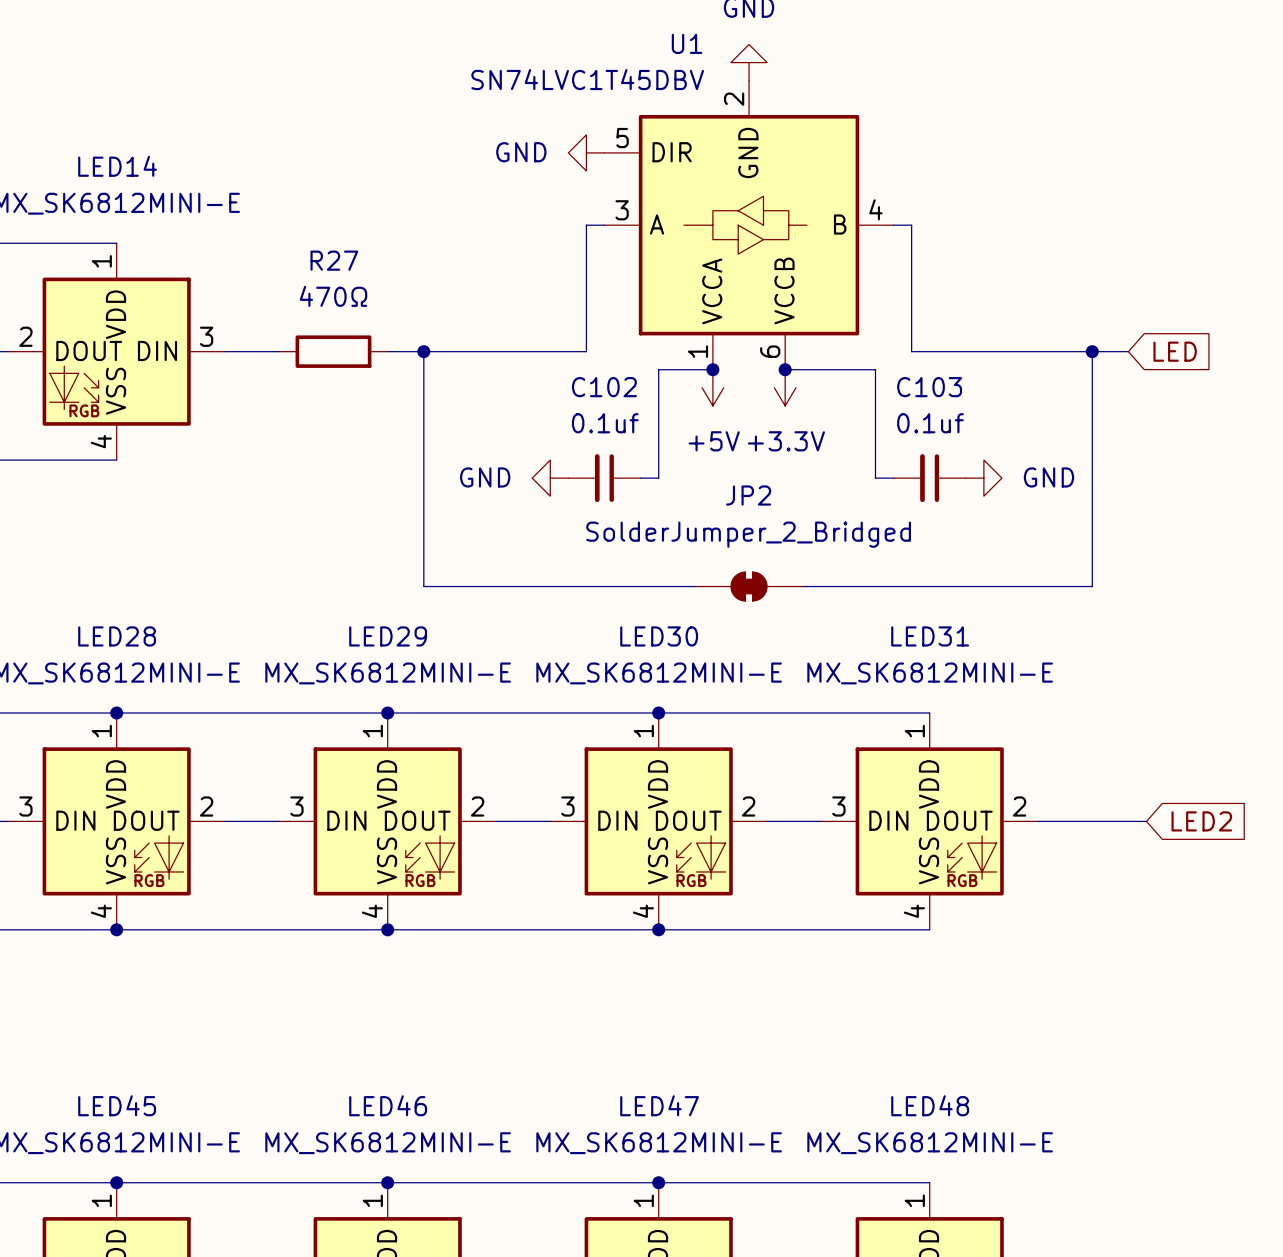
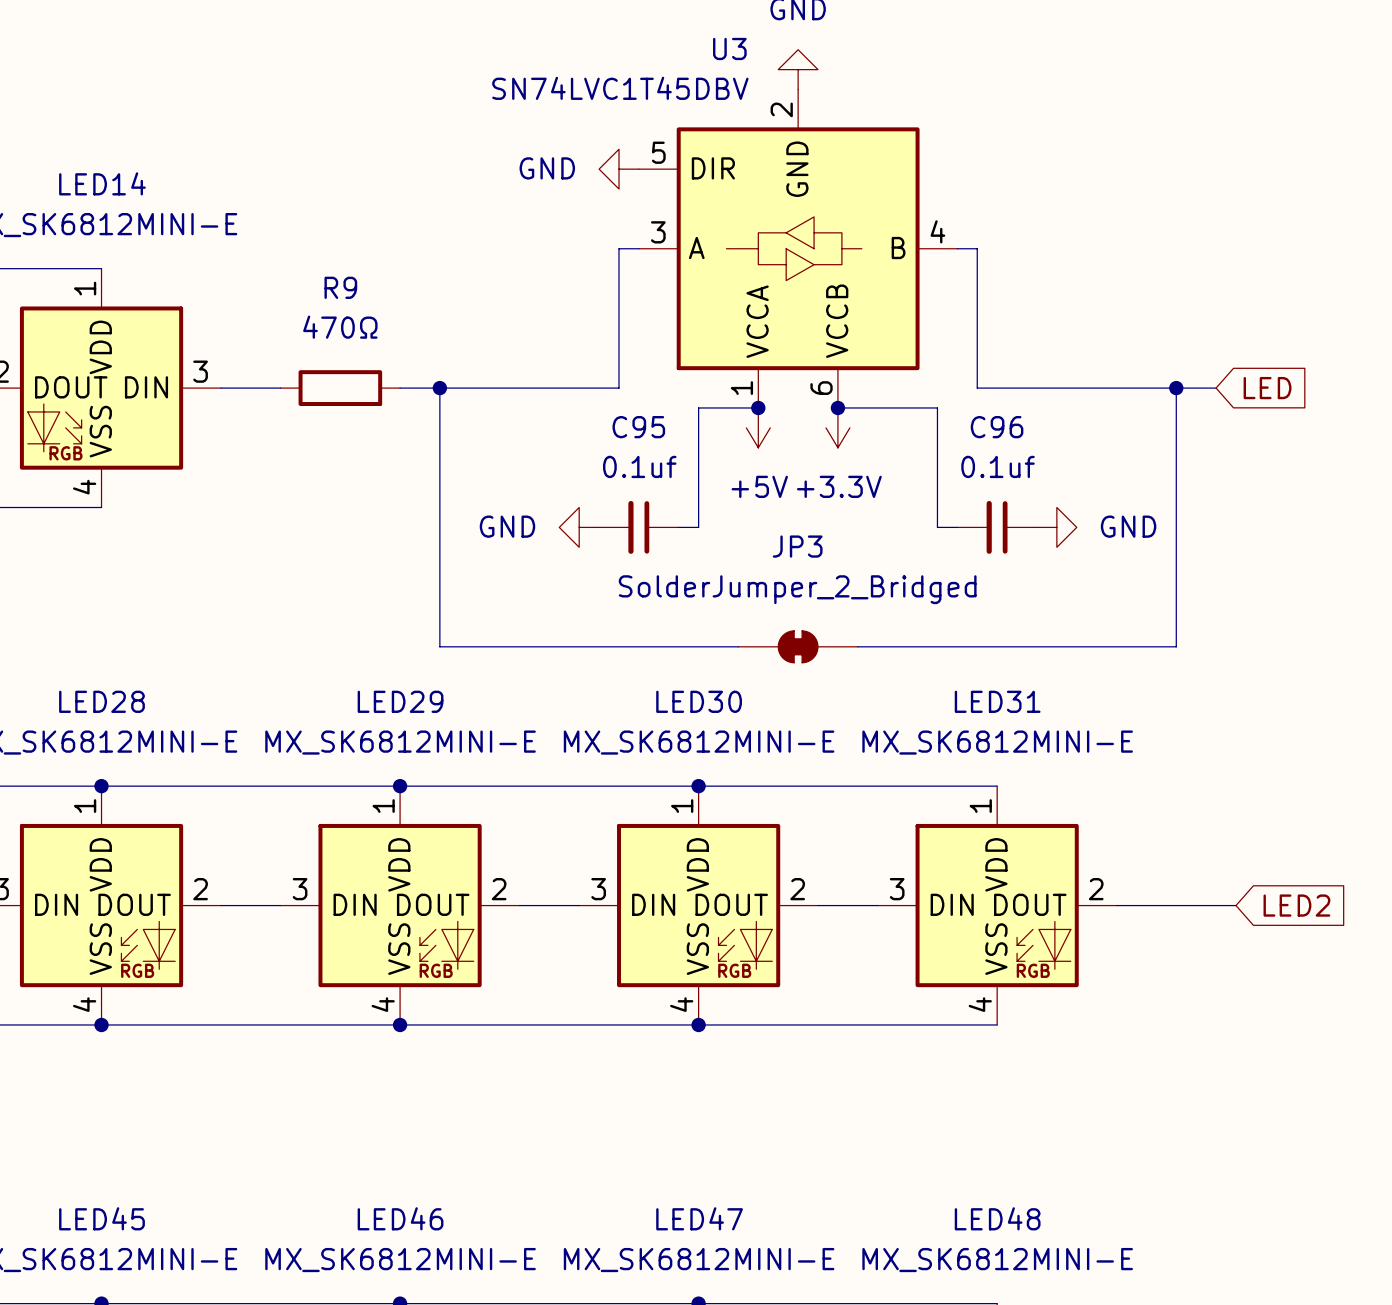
U1 name: U1 (687, 43) -> U3 (729, 48)
R27 name: R27 (334, 260) -> R9 (340, 287)
C102 name: C102 (604, 387) -> C95 (638, 427)
C103 name: C103 (929, 387) -> C96 (997, 427)
JP2 name: JP2 (748, 495) -> JP3 (797, 546)

